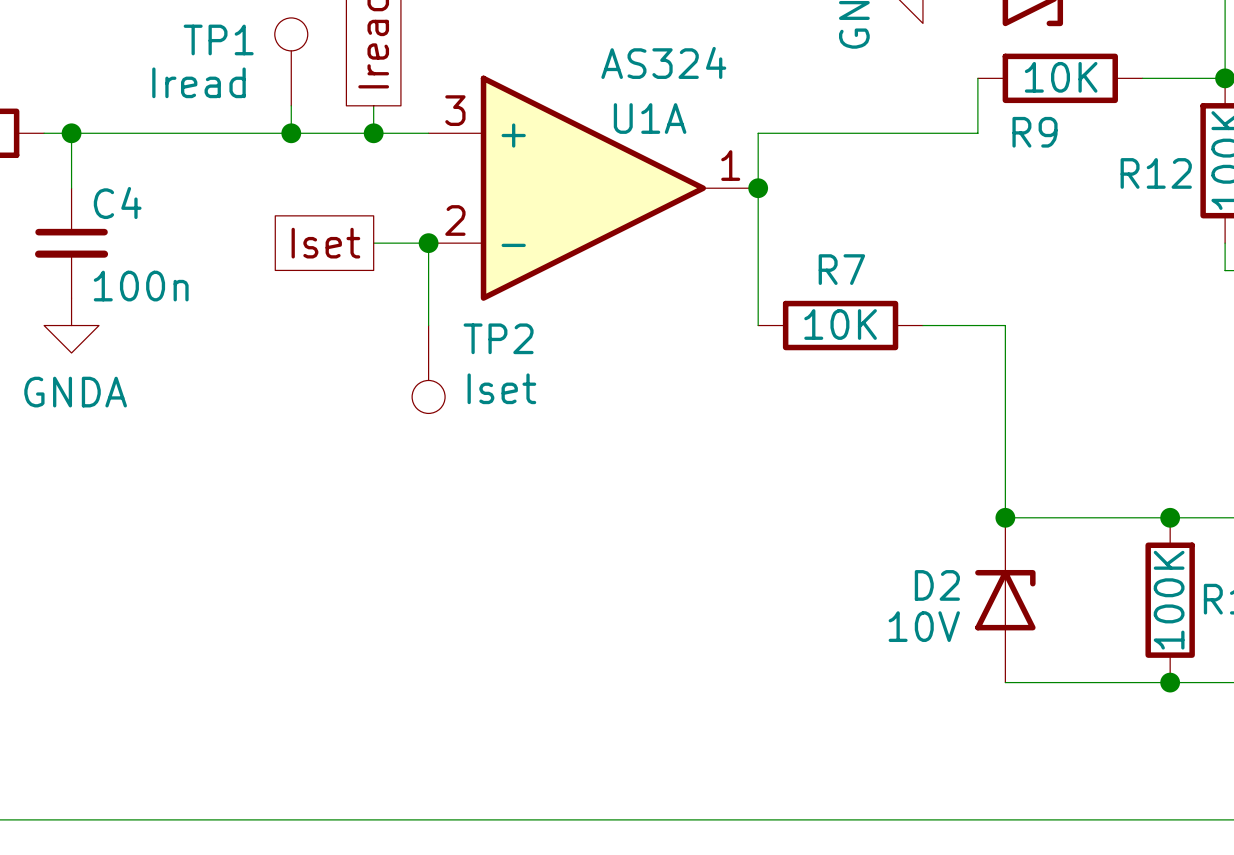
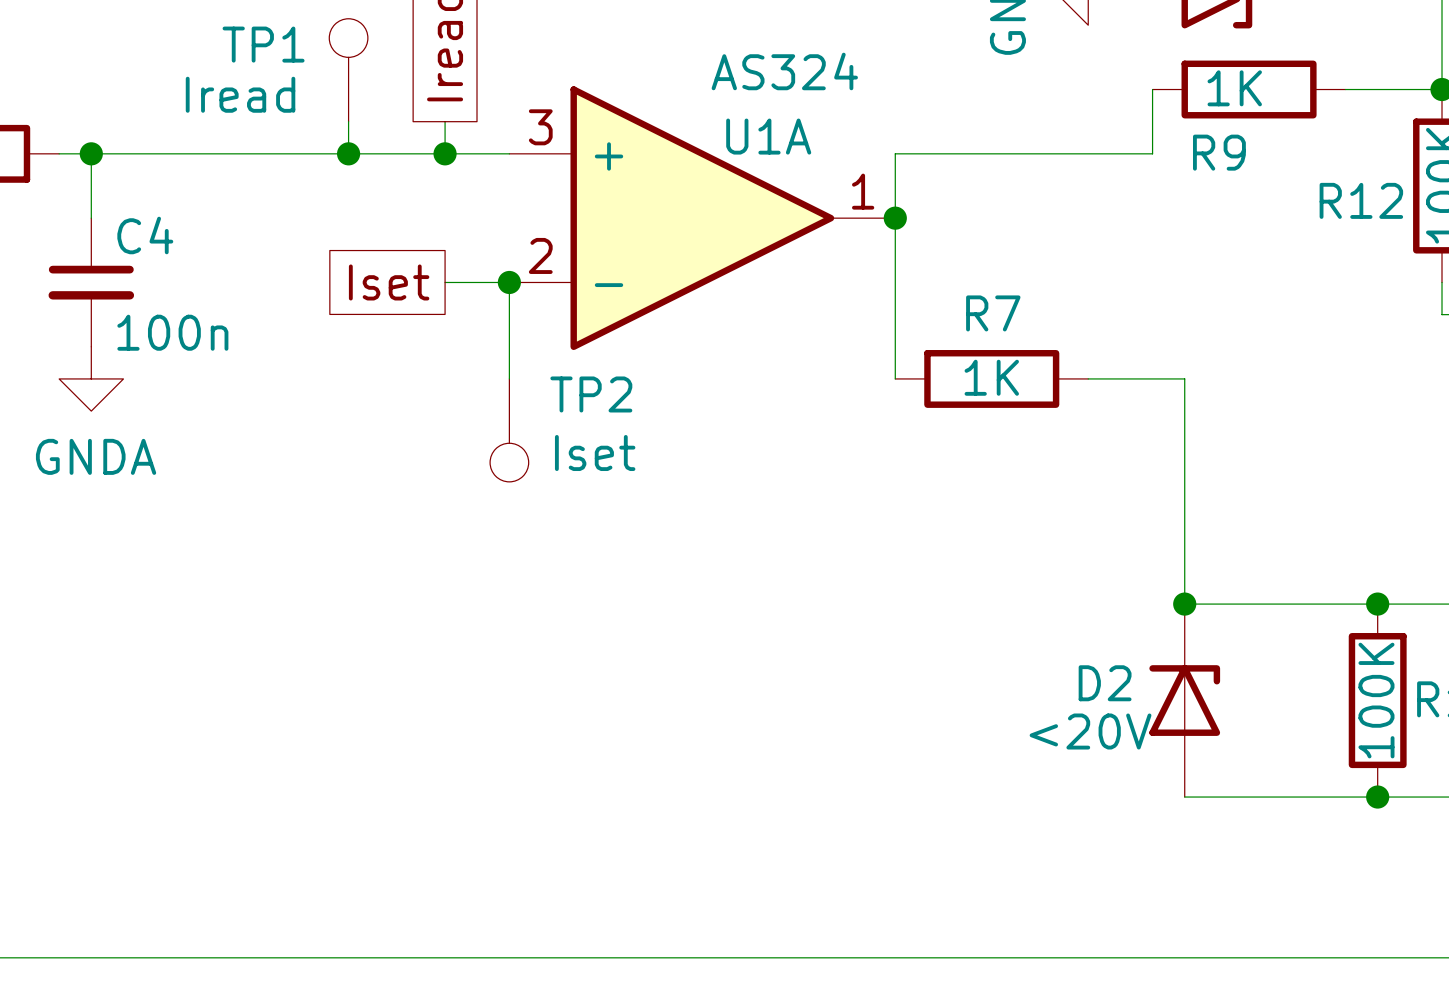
R9 value: 10K (1061, 77) -> 1K (1234, 88)
R7 value: 10K (840, 324) -> 1K (991, 377)
D2 value: 10V (924, 626) -> <20V (1090, 731)

